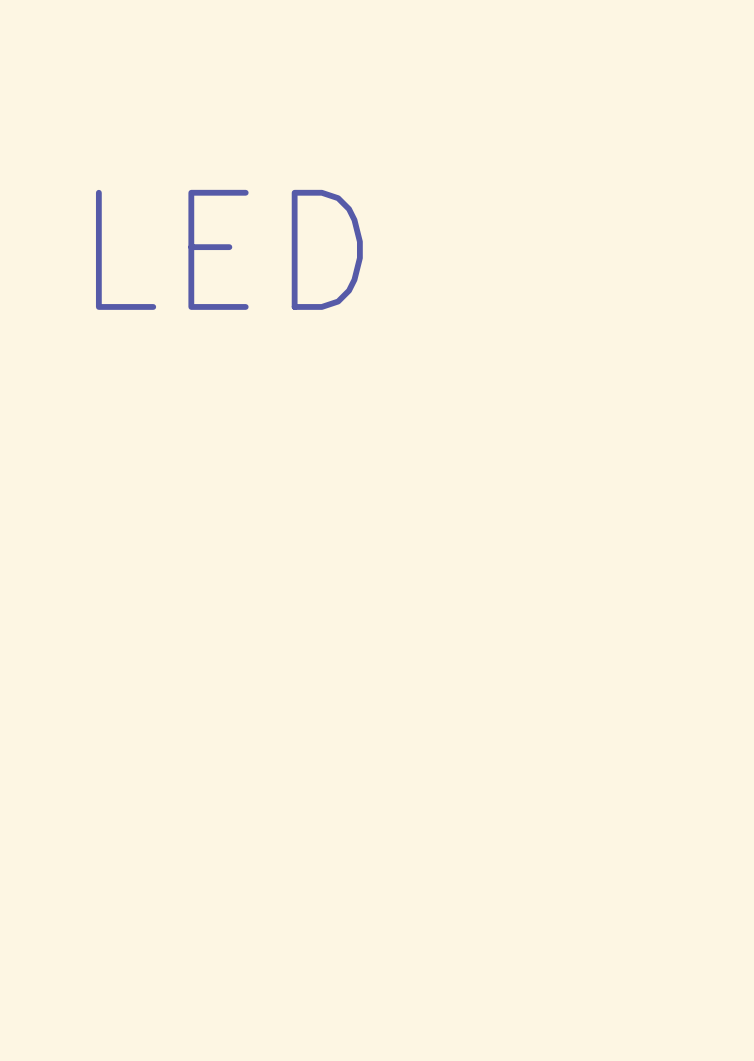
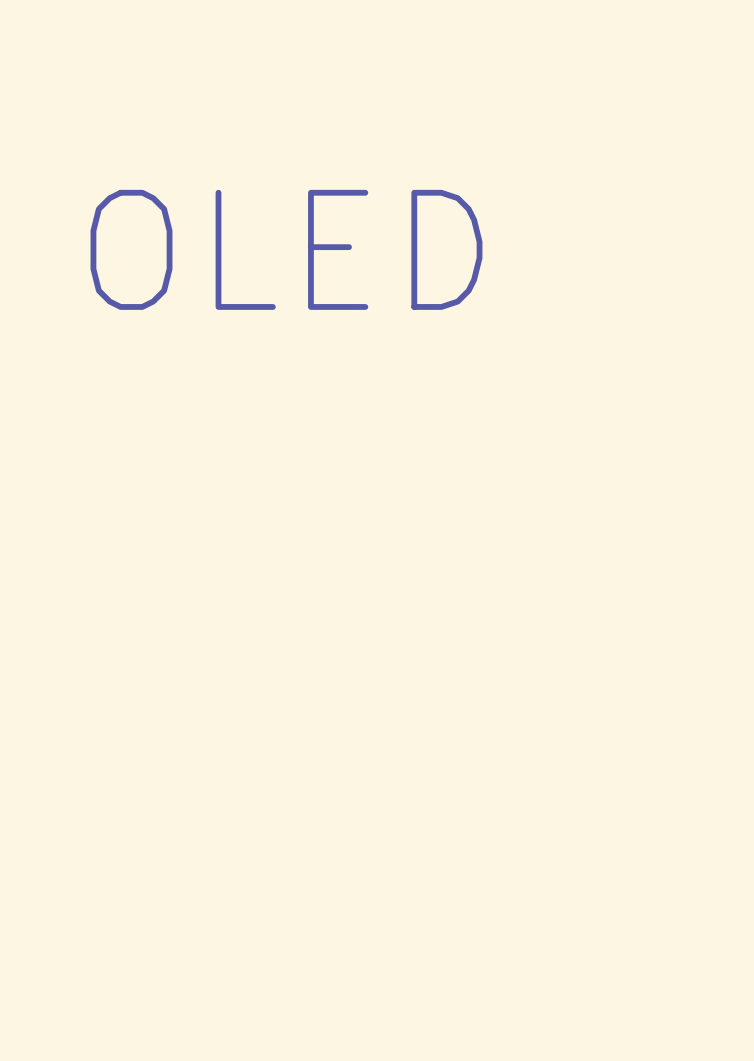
text: LED (229, 249) -> OLED (286, 249)

